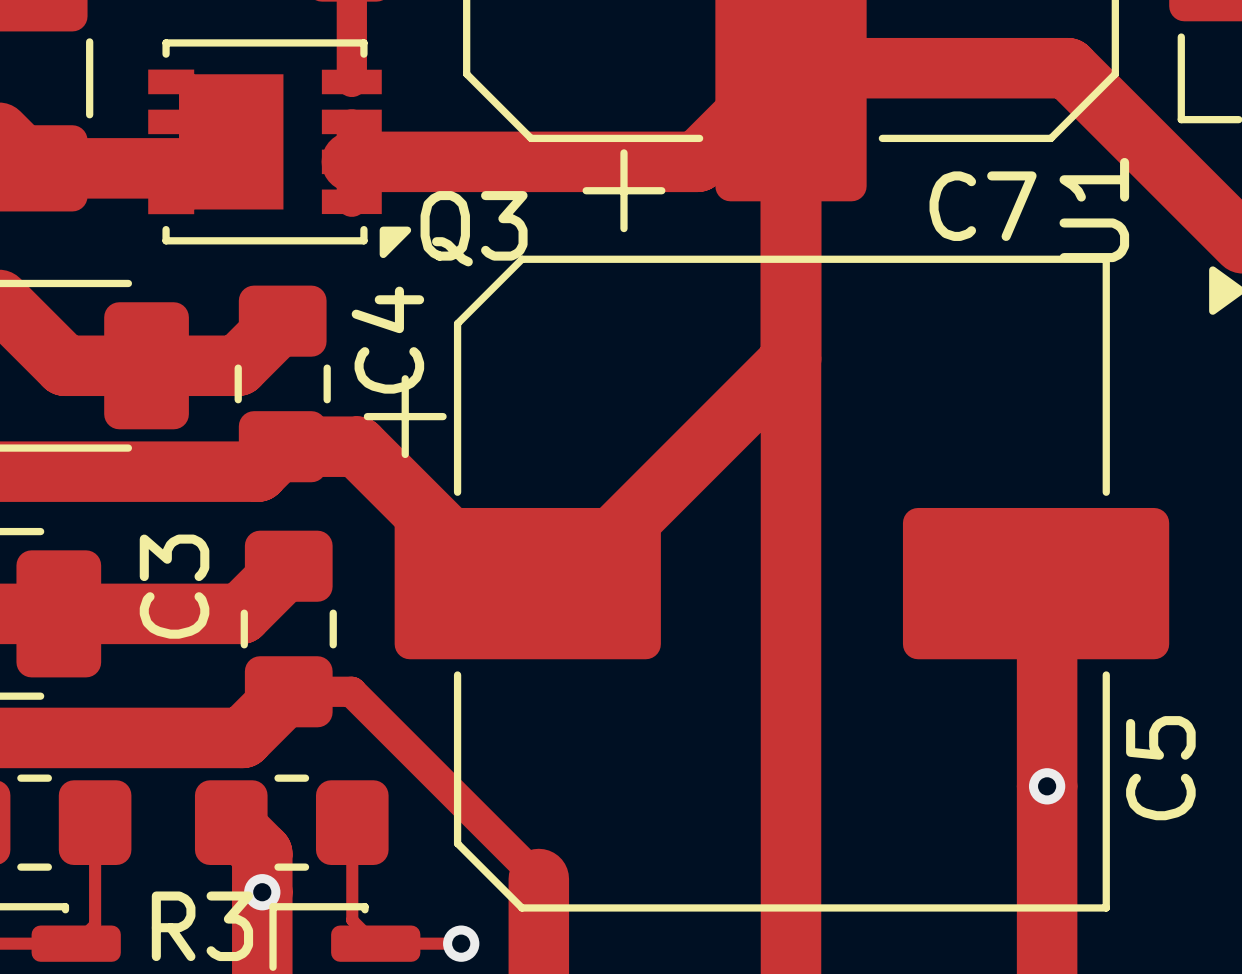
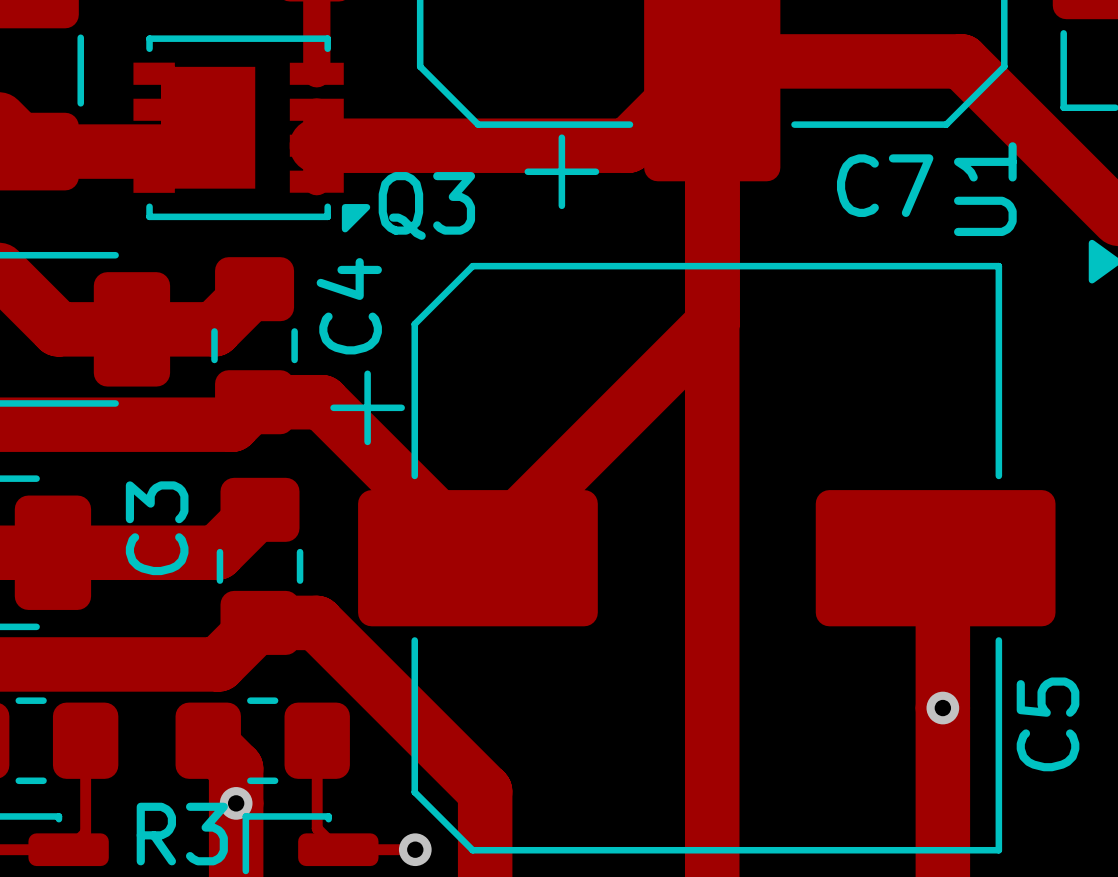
C5 position: (766, 583) -> (692, 558)
track width: thin (288, 691) (351, 691) (538, 879) -> thick (260, 622) (316, 622) (485, 791)

